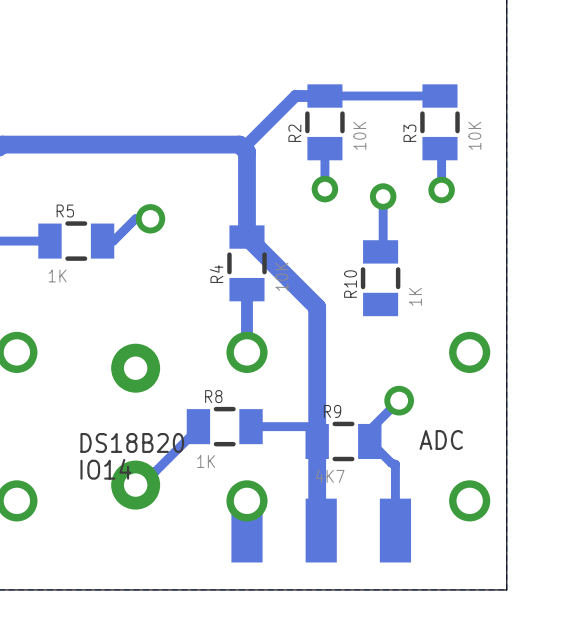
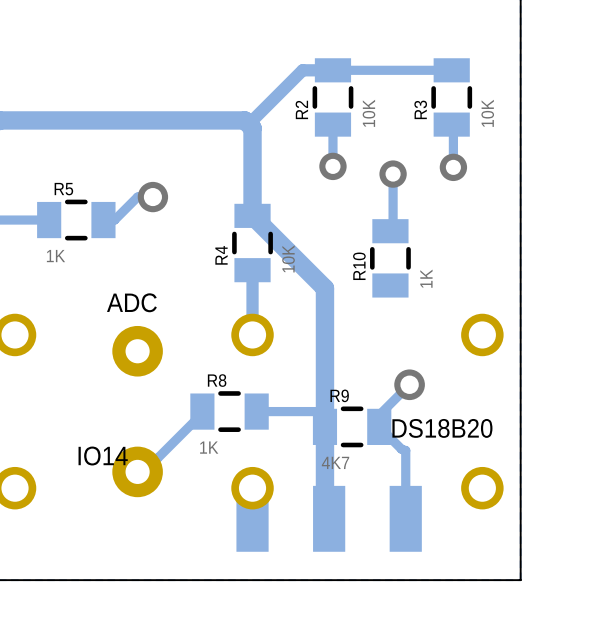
text position: ADC (441, 440) -> ADC (131, 302)
text position: DS18B20 (132, 442) -> DS18B20 (442, 428)

